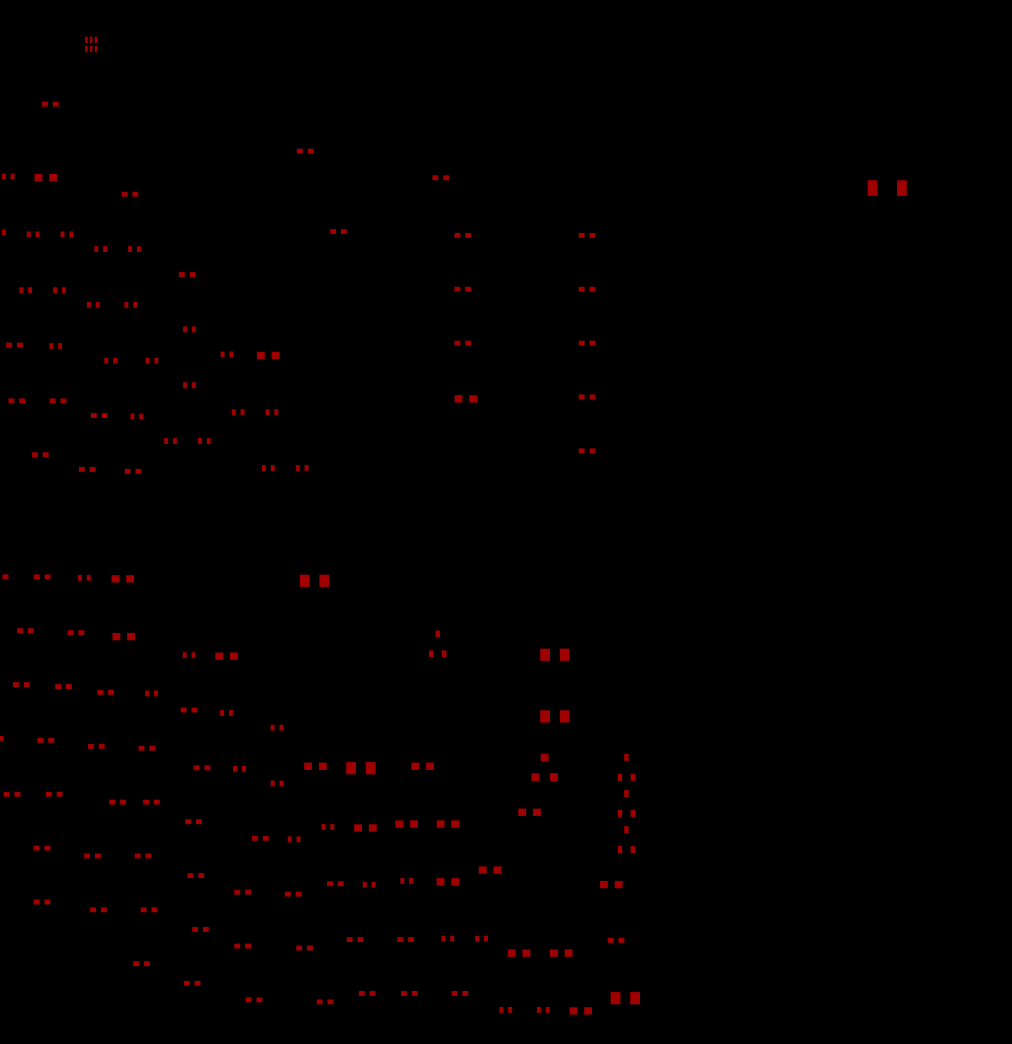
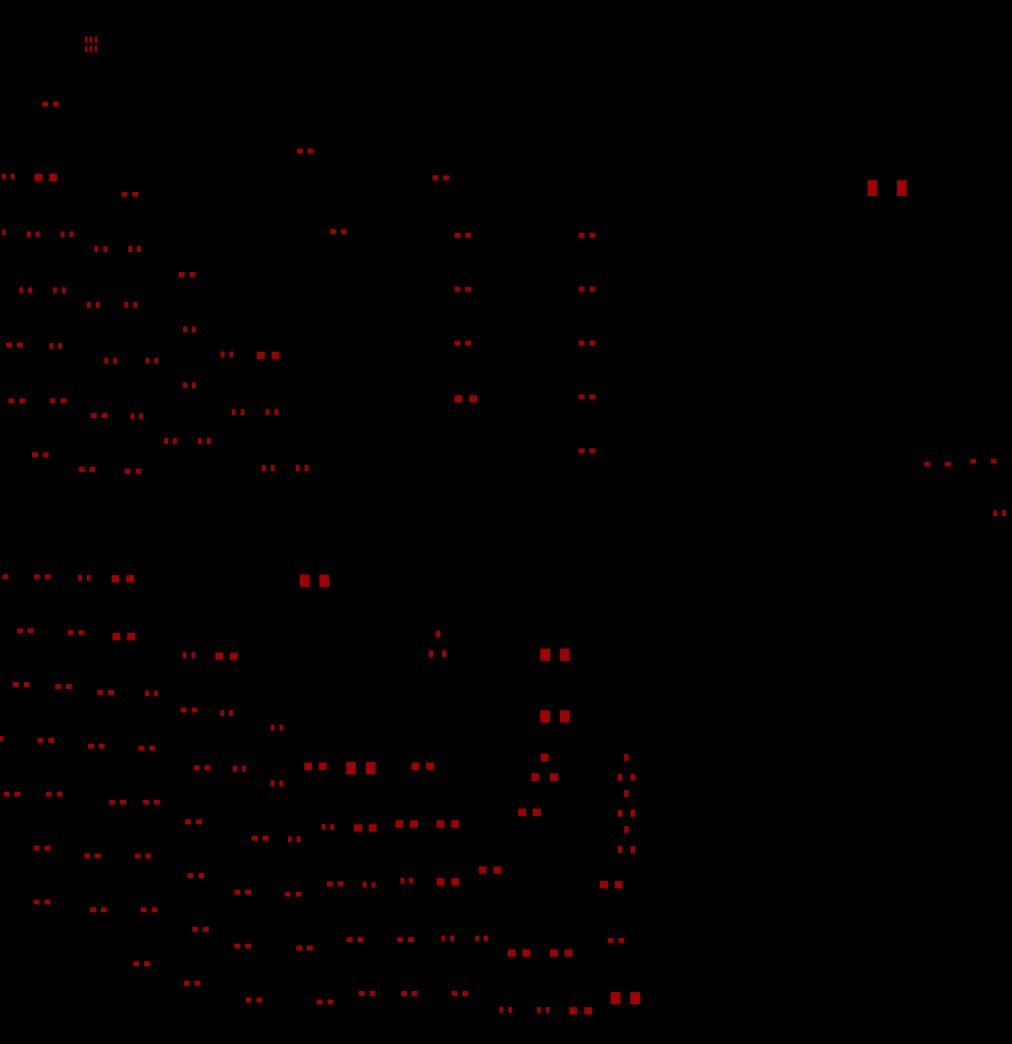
part: none -> (983, 461)
part: none -> (937, 464)
part: none -> (999, 513)

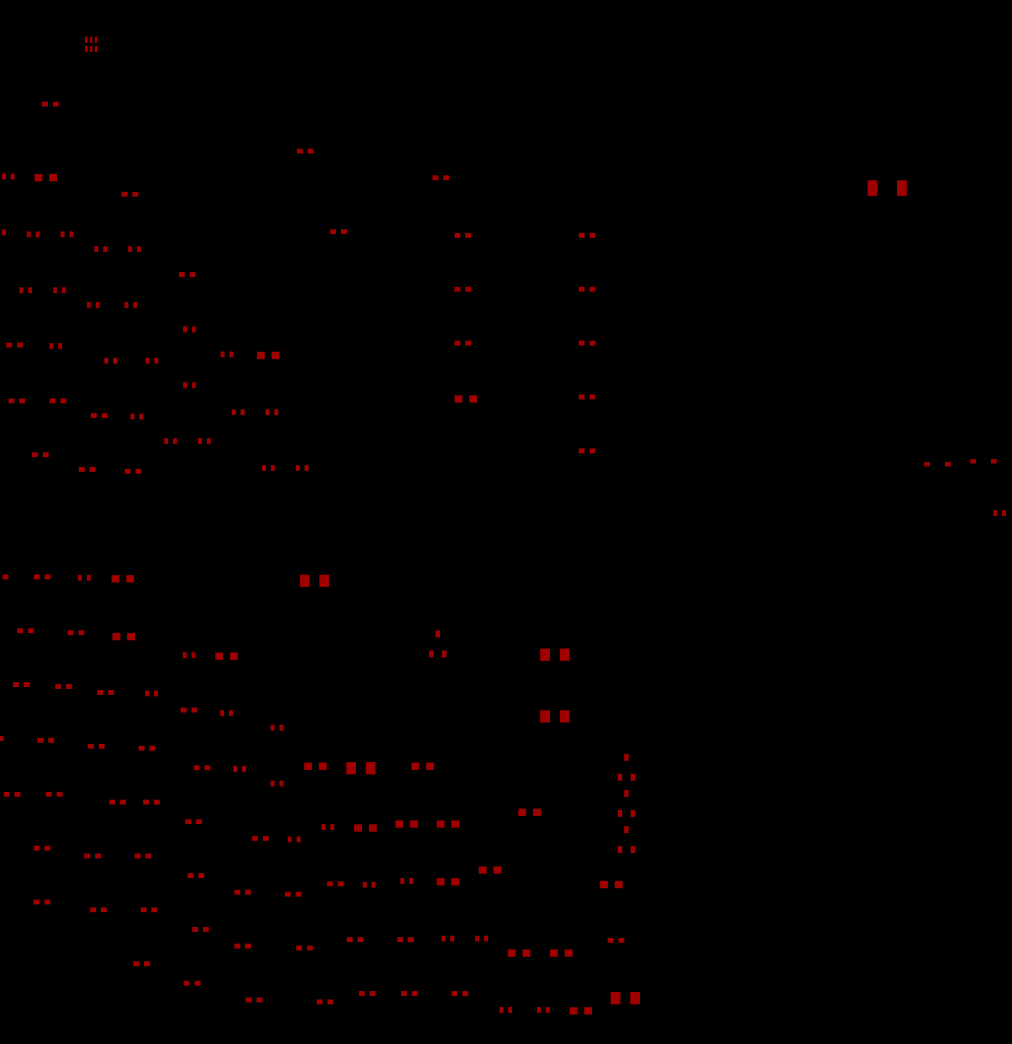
part: (544, 767) -> none

